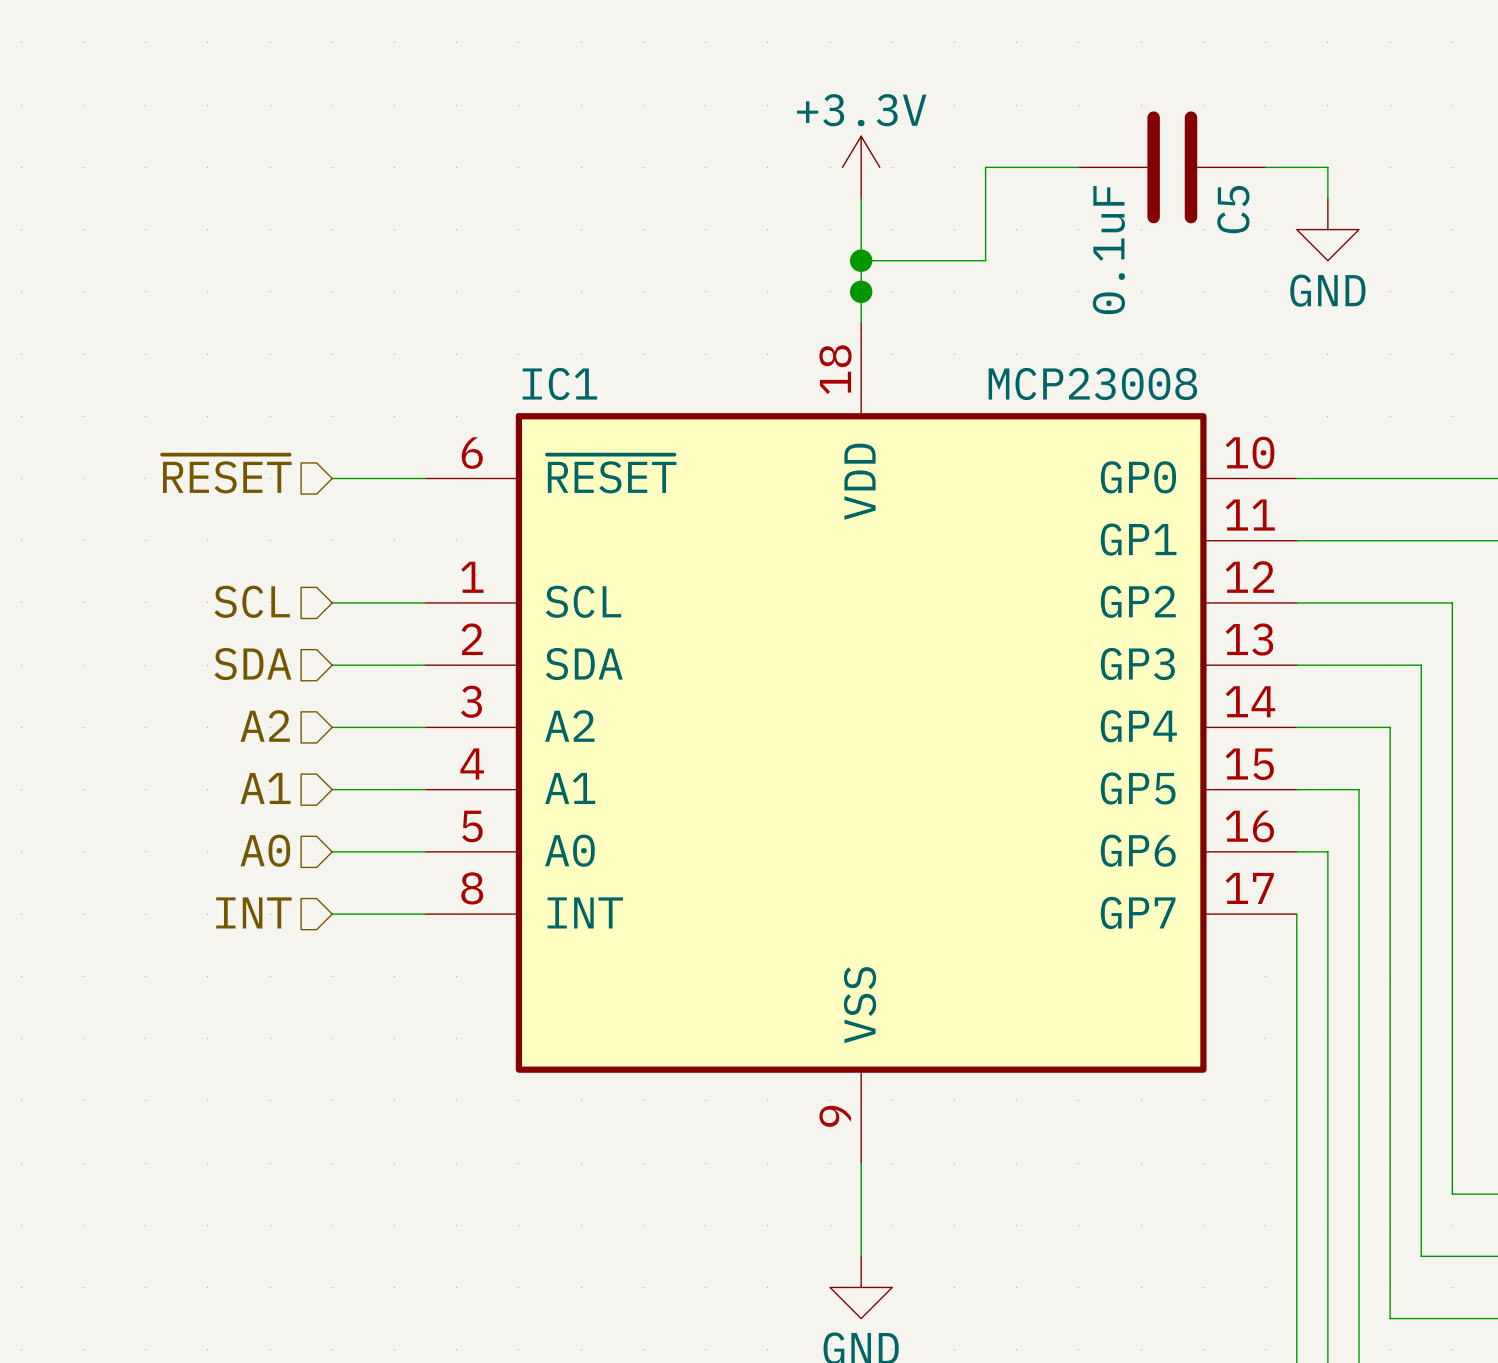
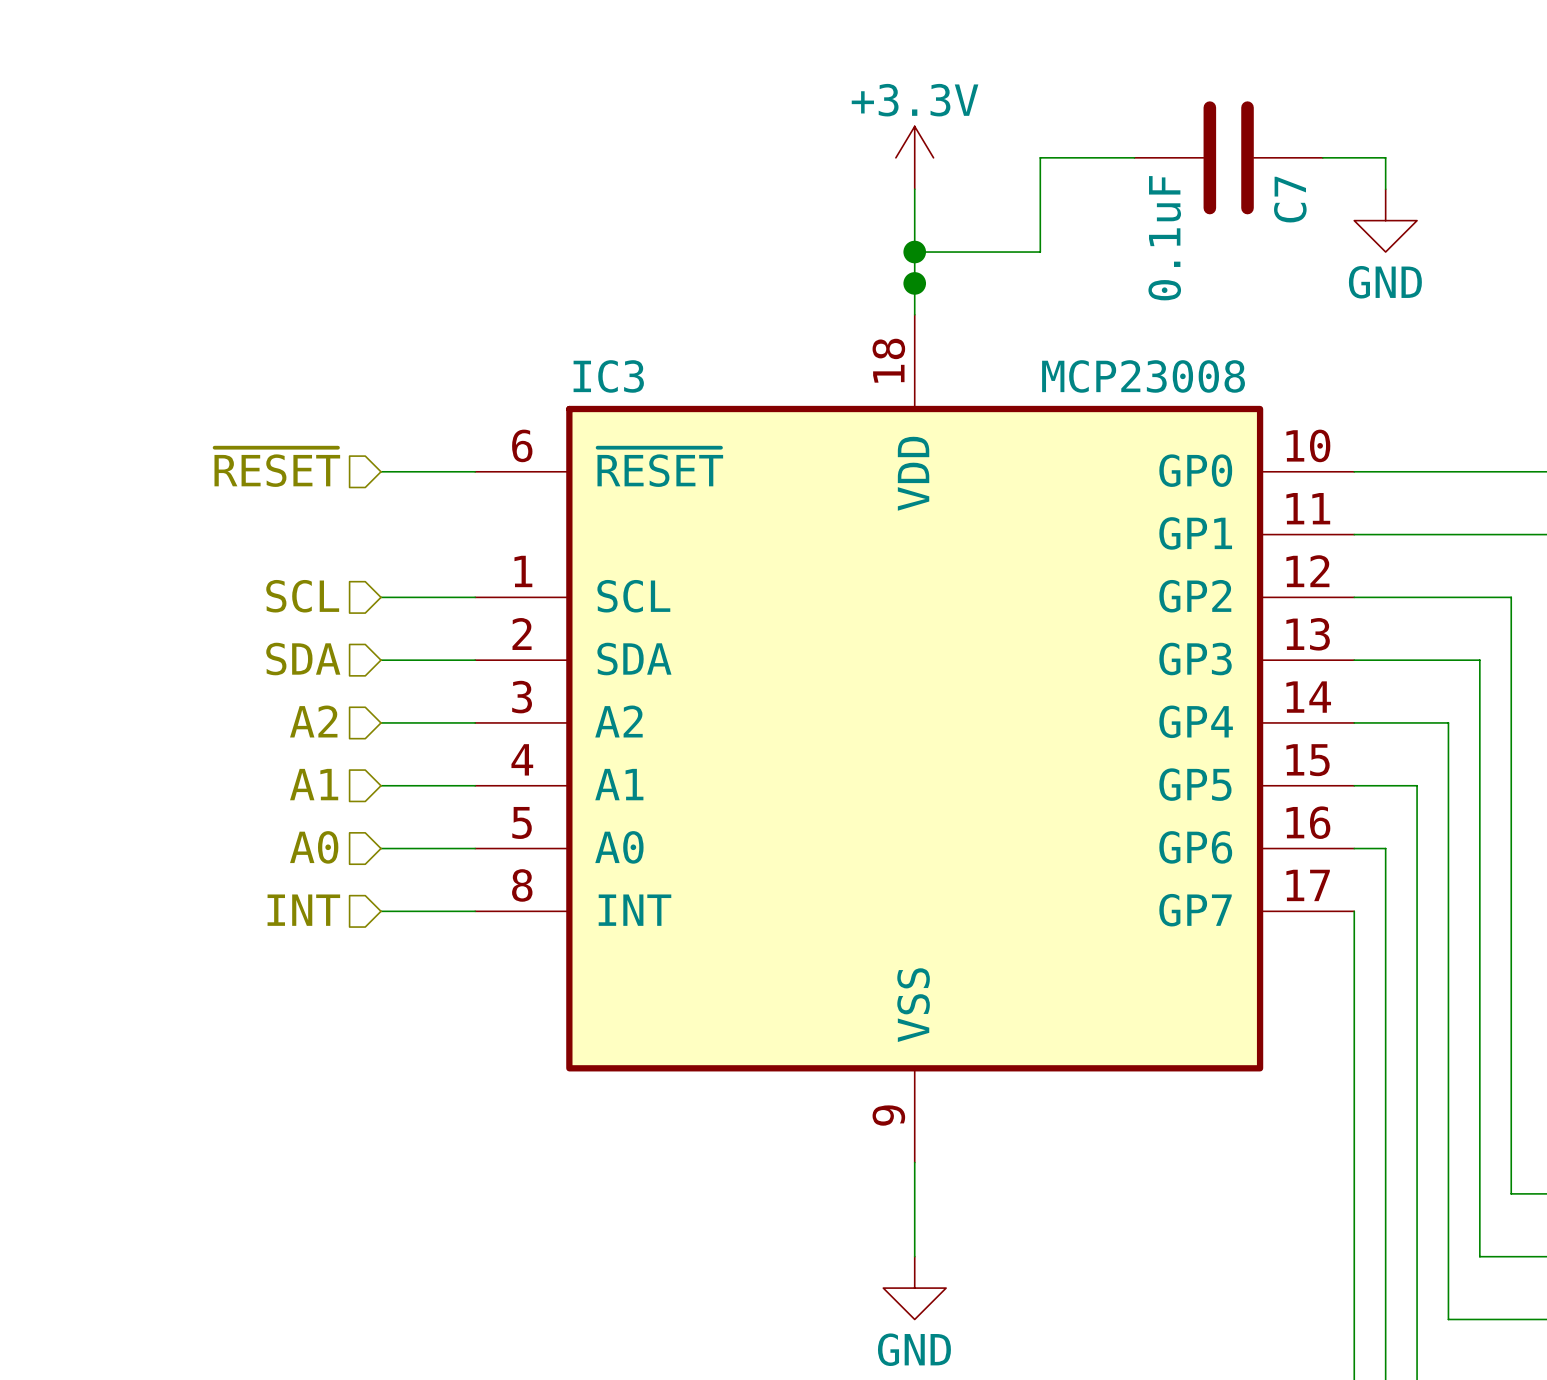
C5 name: C5 (1233, 209) -> C7 (1290, 199)
IC1 name: IC1 (559, 384) -> IC3 (608, 376)

